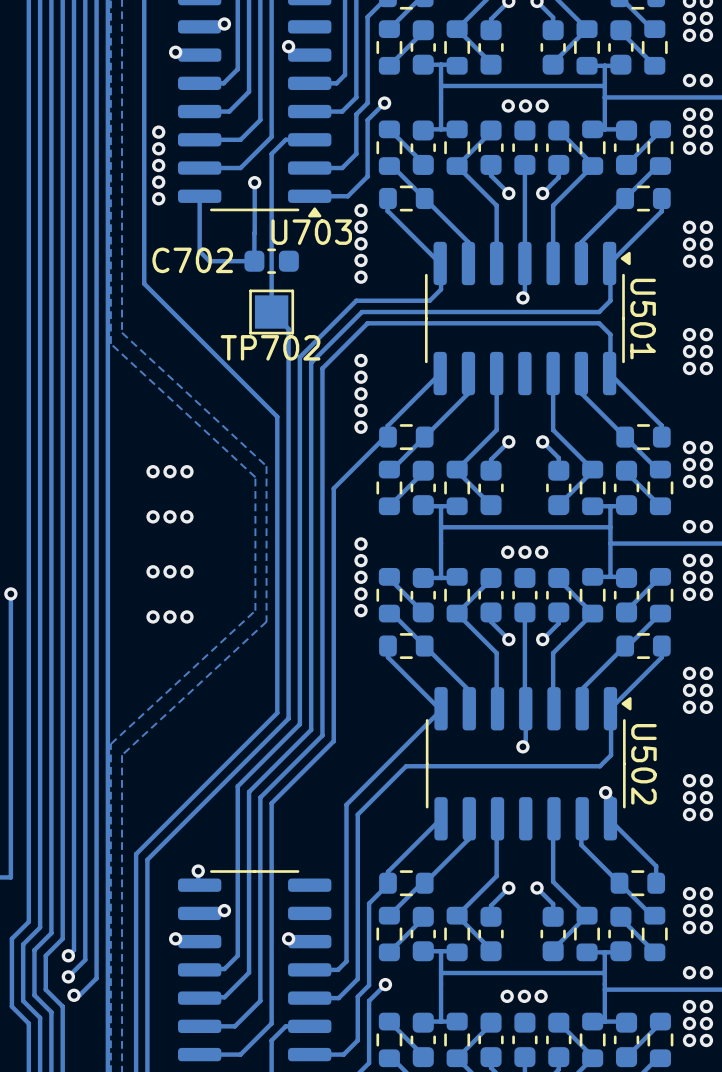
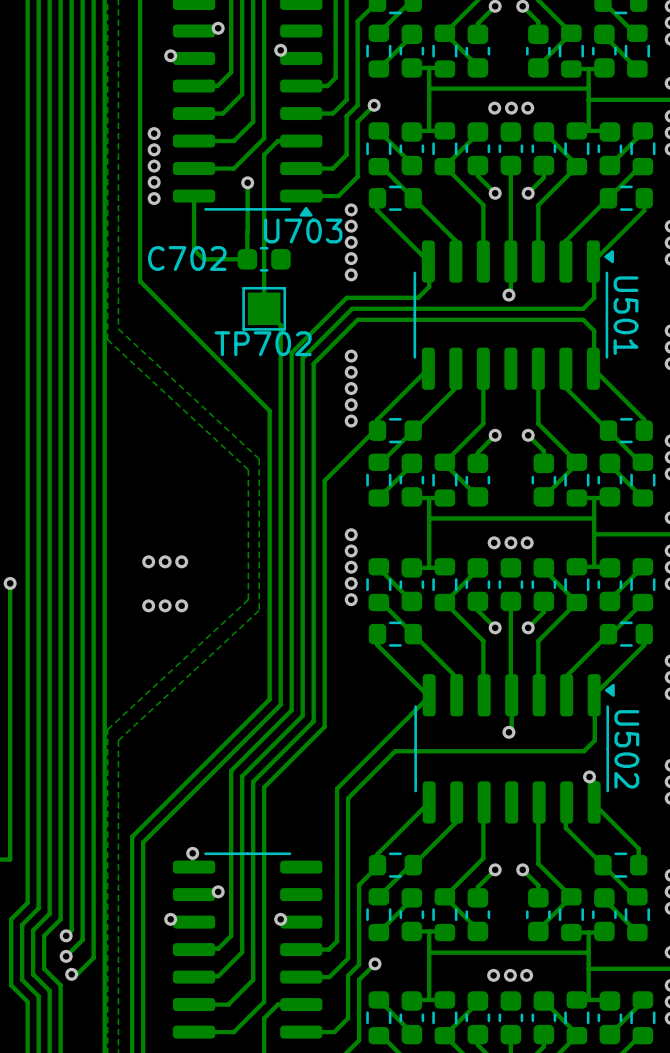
via: (153, 471) -> none
via: (170, 471) -> none
via: (186, 471) -> none
via: (153, 516) -> none
via: (170, 516) -> none
via: (186, 516) -> none

